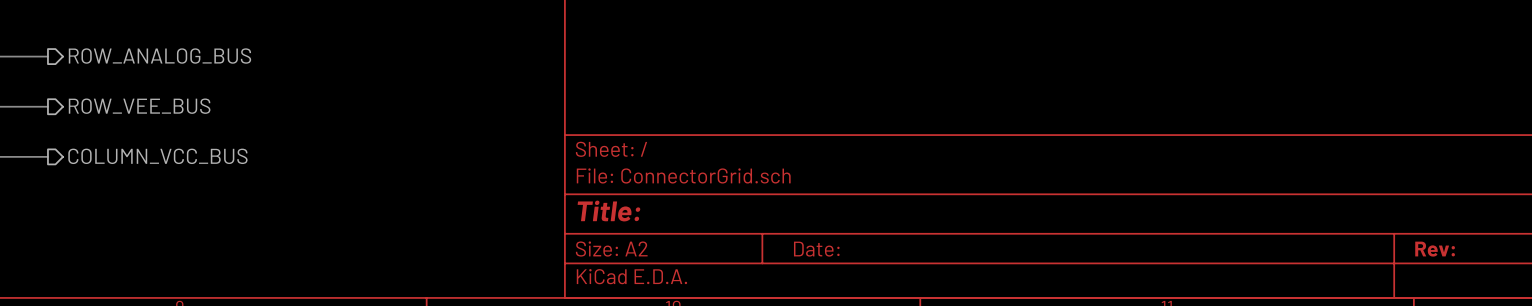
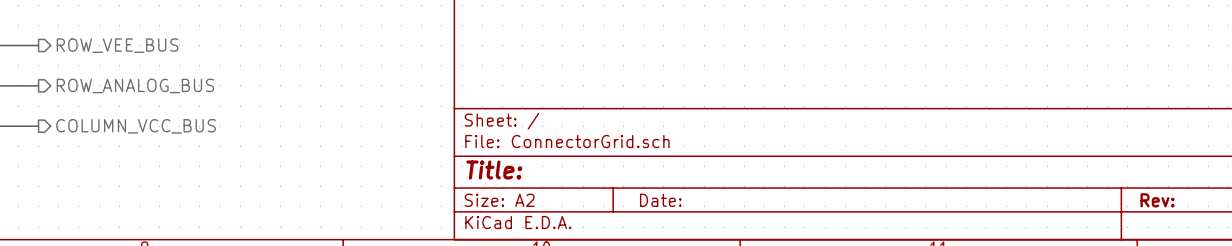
hierarchical label: ROW_ANALOG_BUS (159, 56) -> ROW_VEE_BUS (117, 45)
hierarchical label: ROW_VEE_BUS (139, 106) -> ROW_ANALOG_BUS (135, 85)

